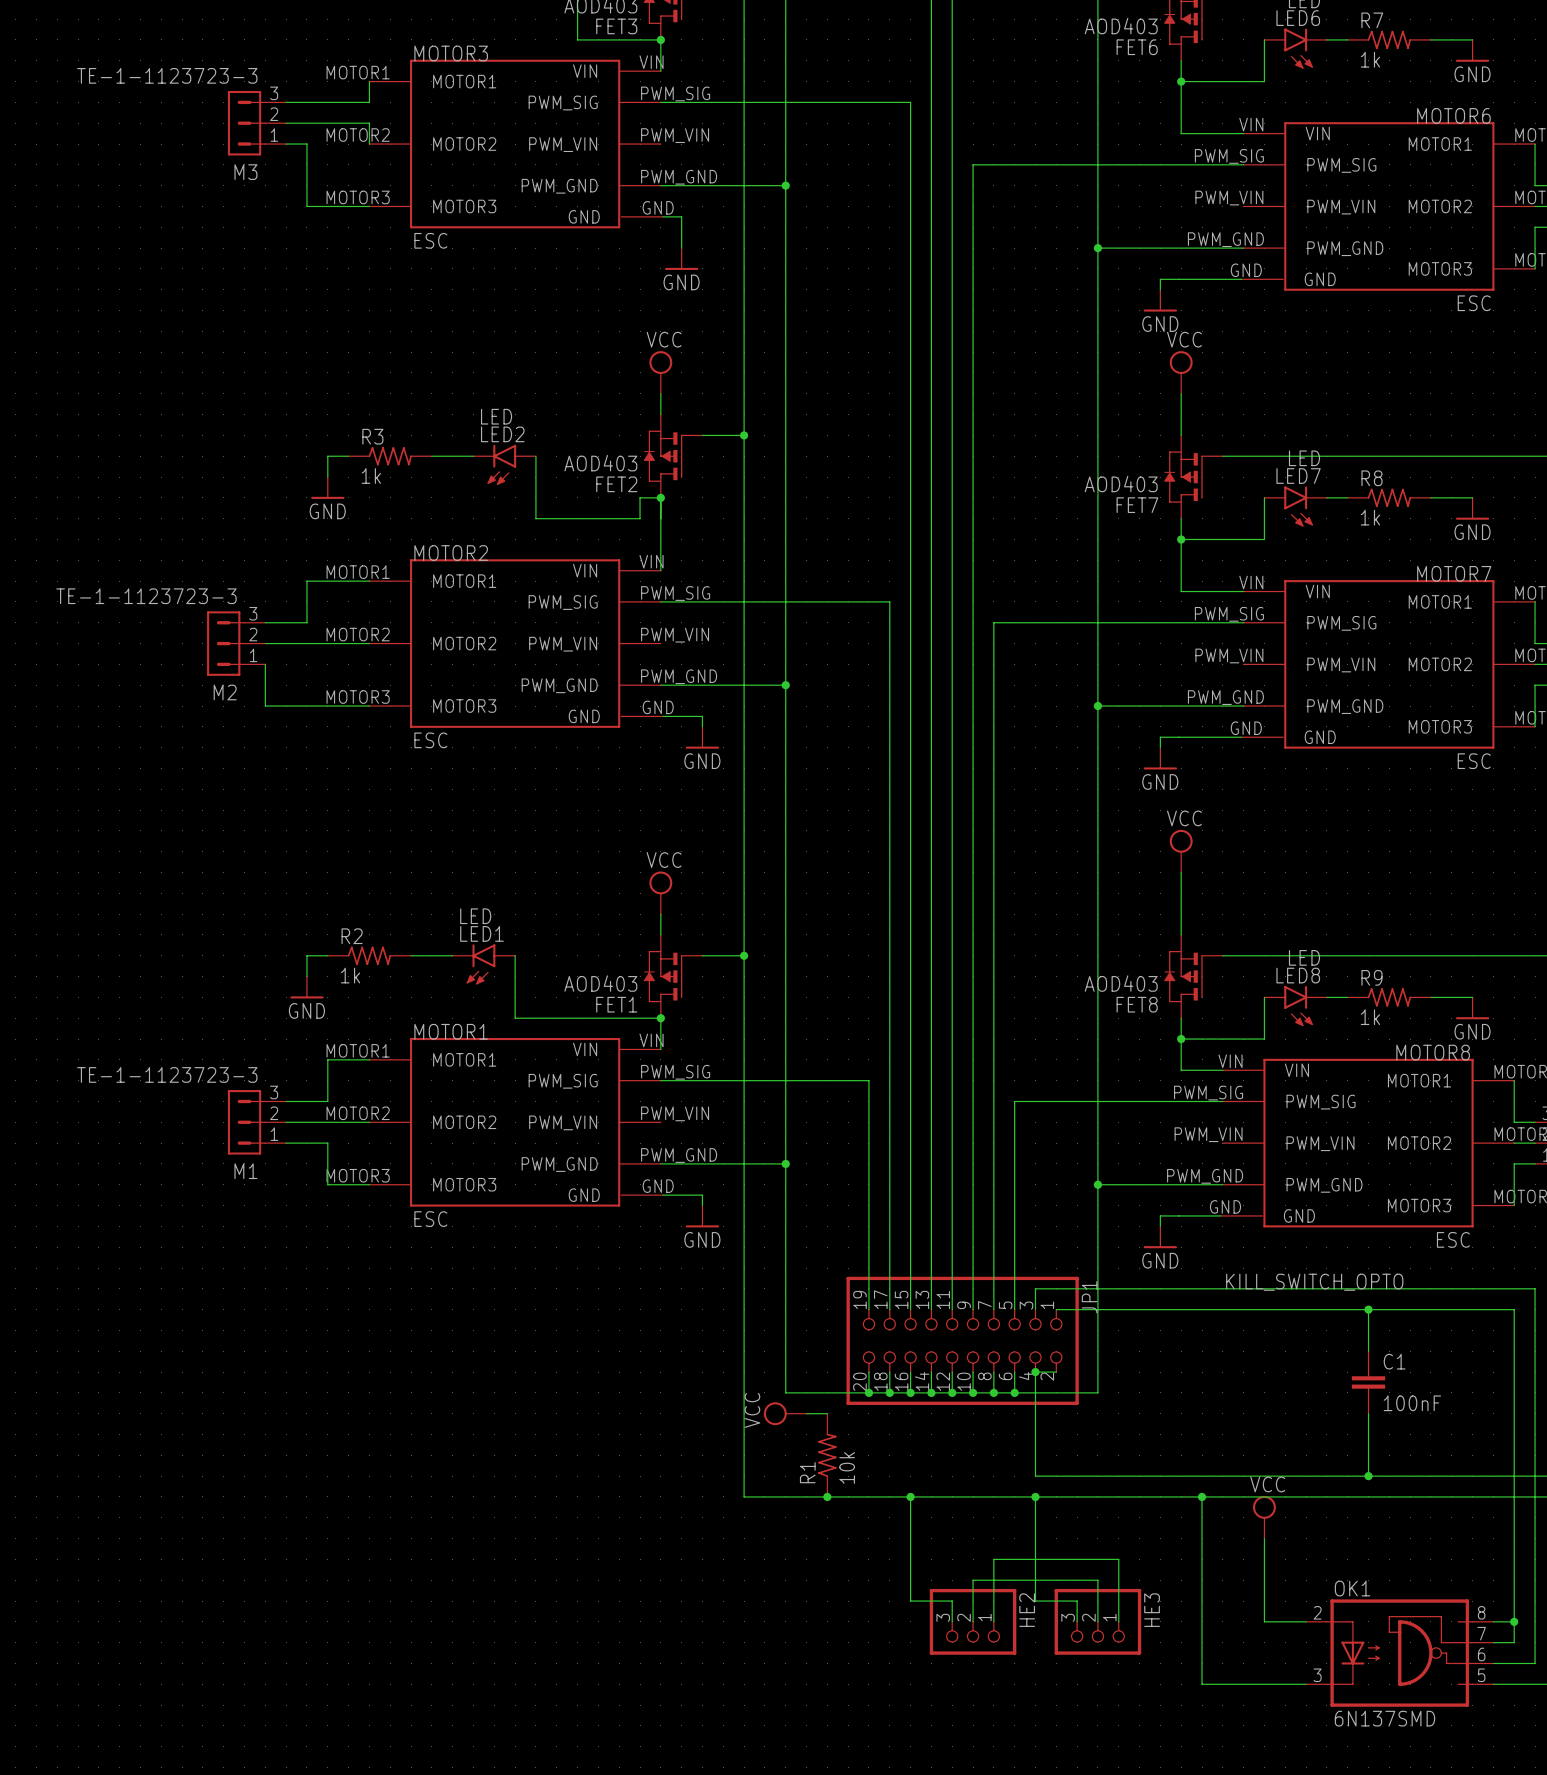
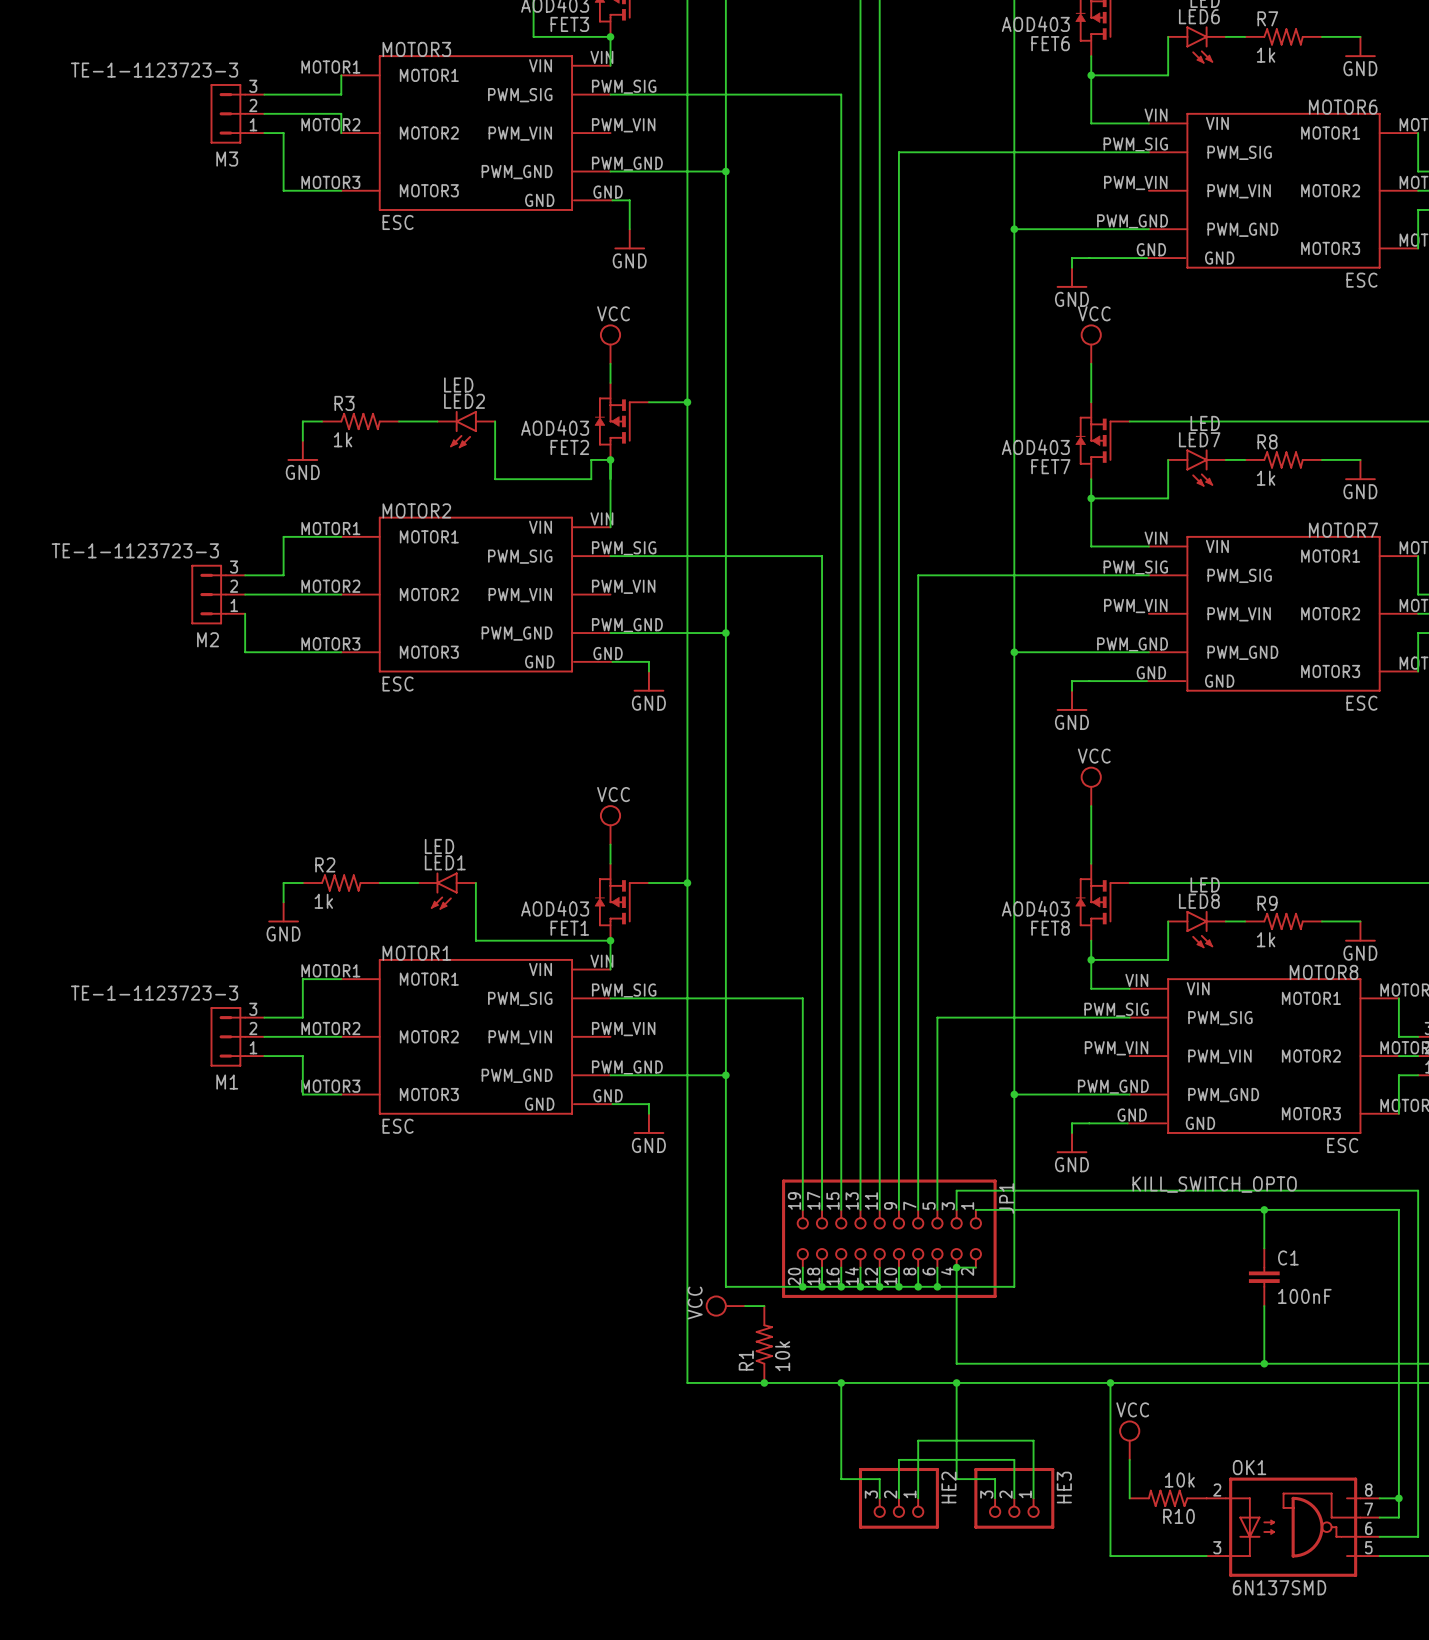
power symbol position: VCC (1264, 1517) -> VCC (1129, 1440)
wire: (1264, 1538) (1264, 1621) (1306, 1621) -> none
wire: none -> (1129, 1459) (1129, 1498)
R10: none -> 10k (1168, 1498)

